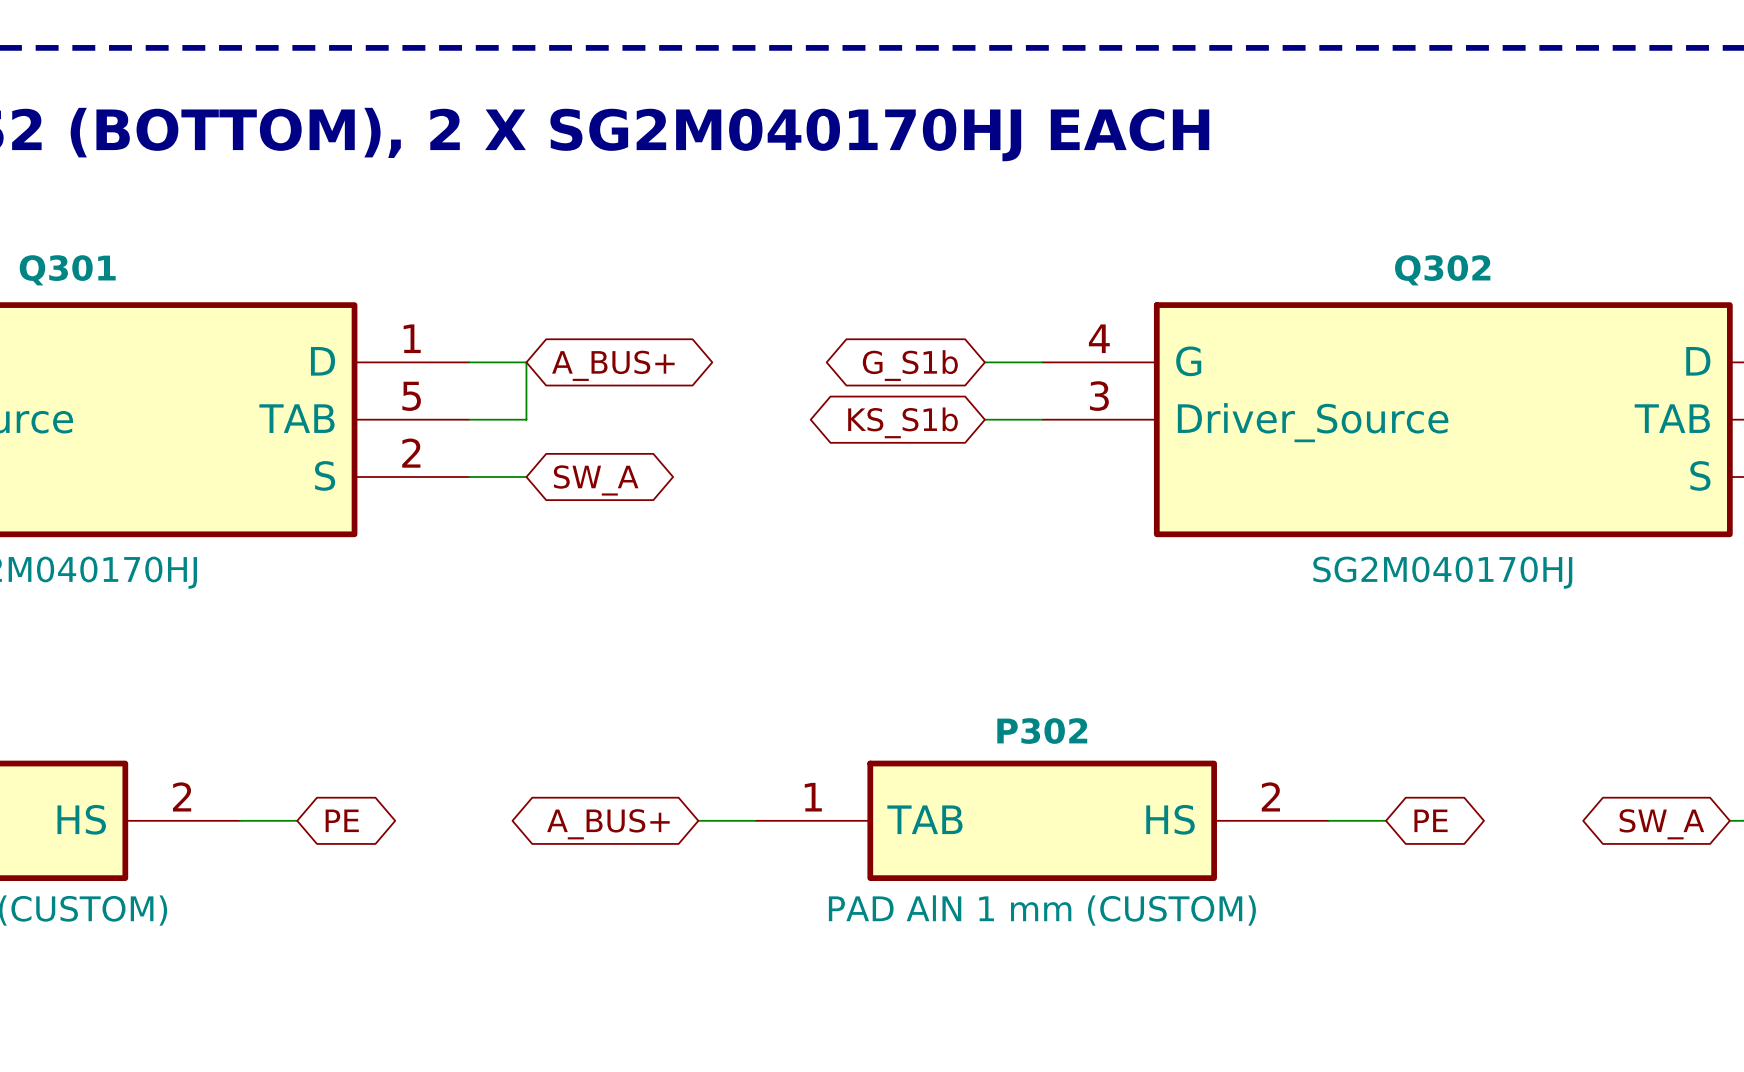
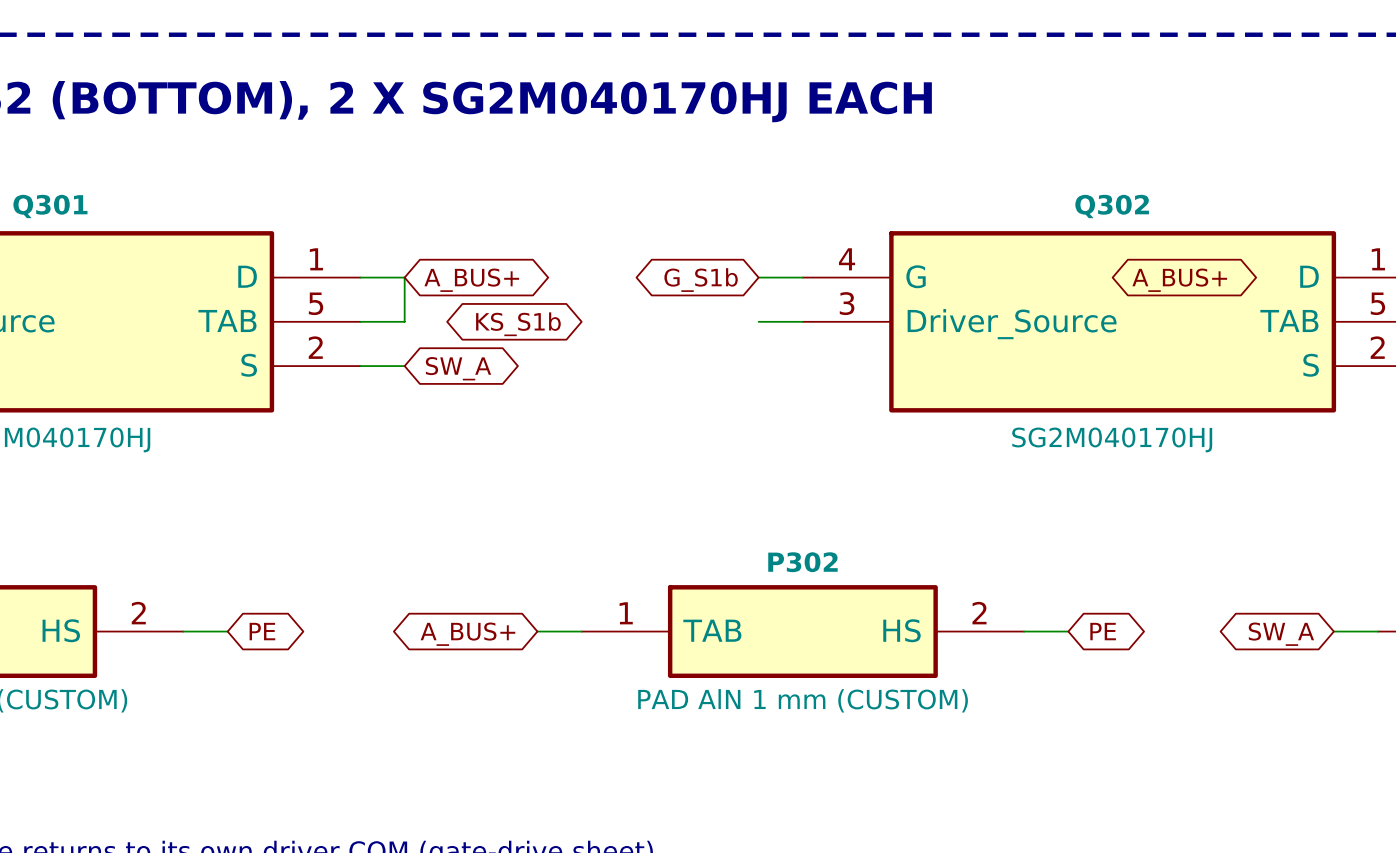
global label: none -> A_BUS+ (1179, 280)
global label position: KS_S1b (902, 422) -> KS_S1b (518, 324)

